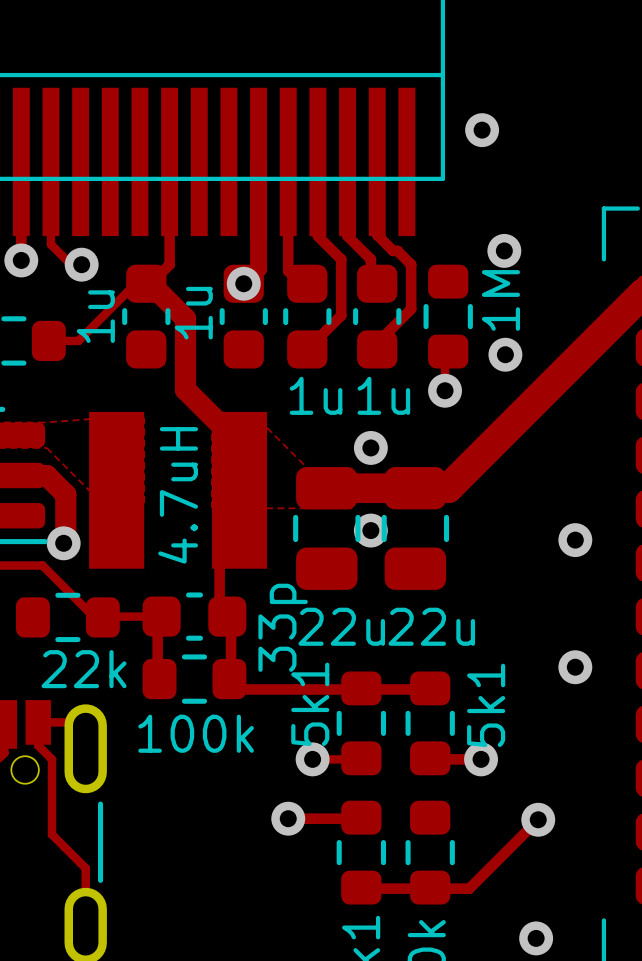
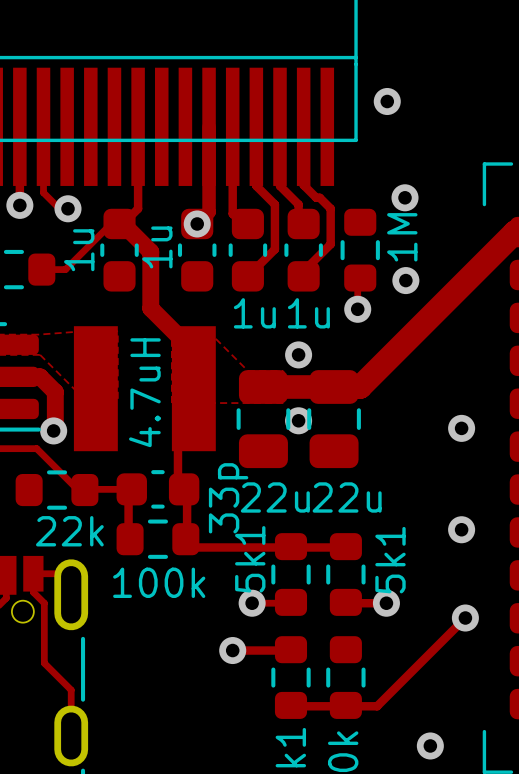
track: none -> (465, 618) (432, 651)
via position: (538, 819) -> (465, 618)

